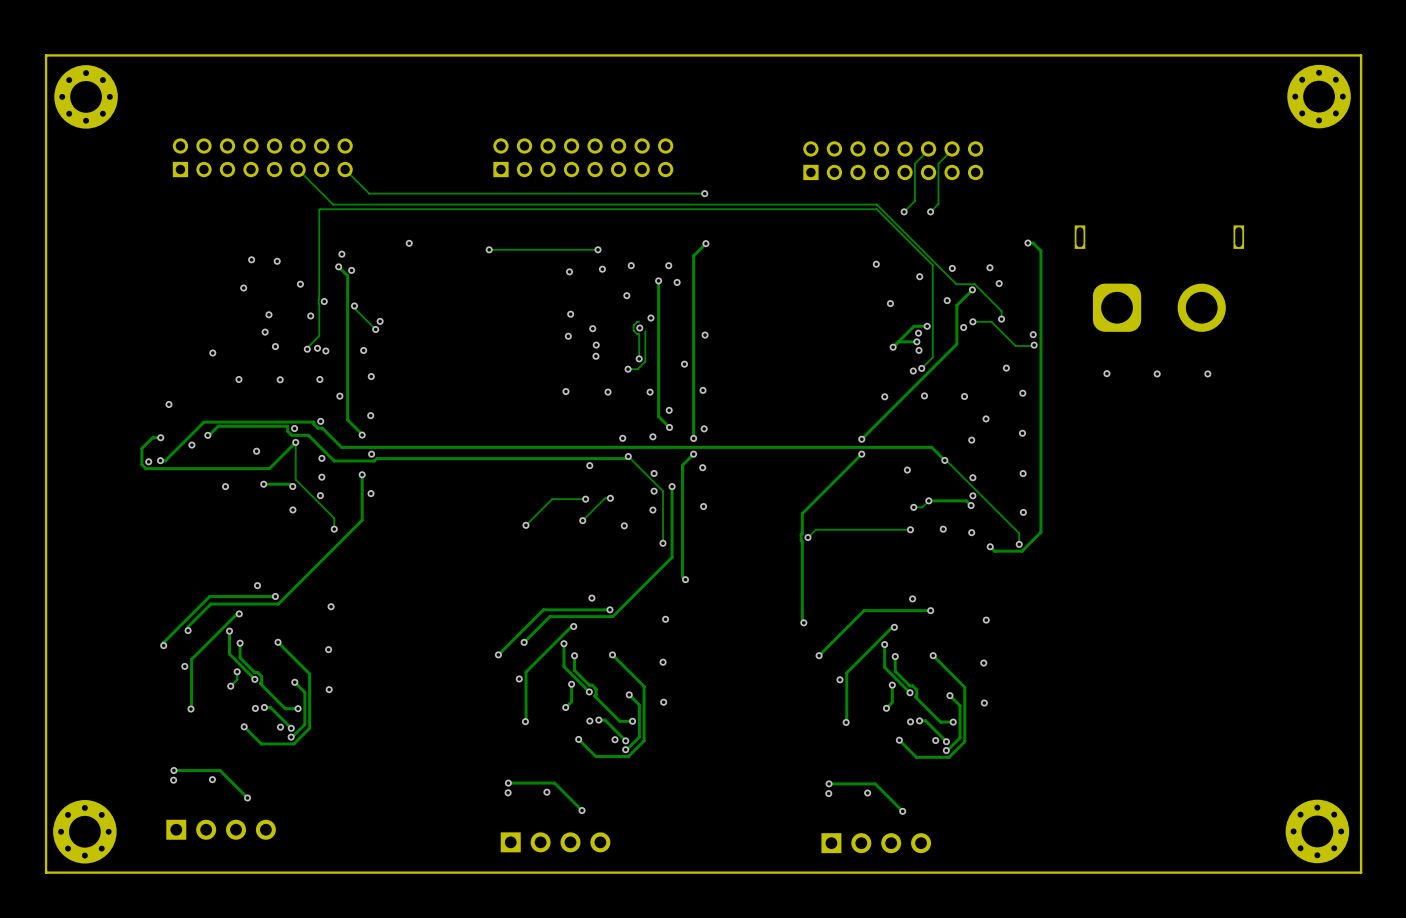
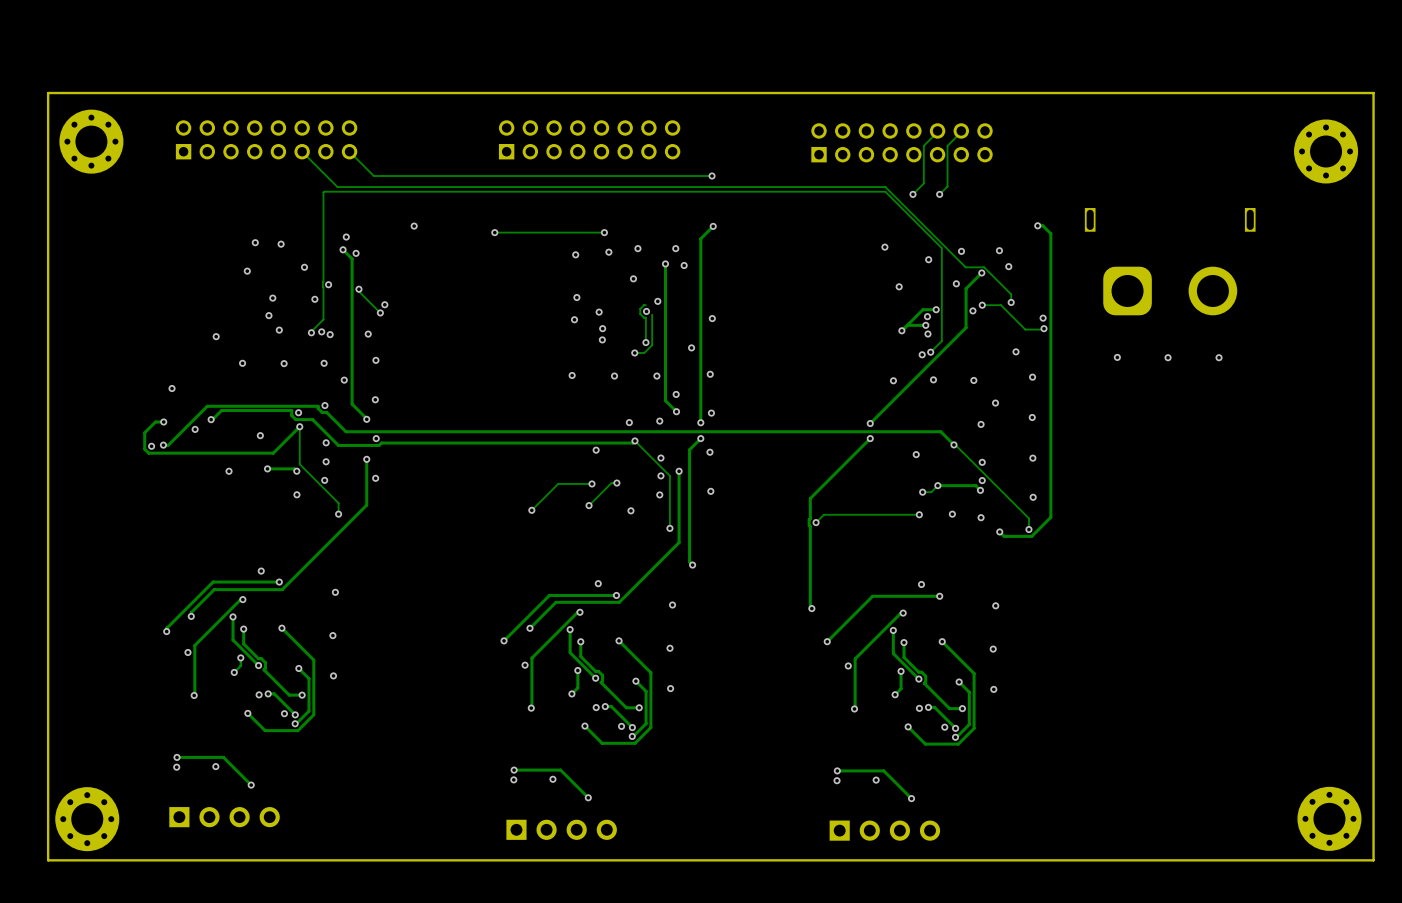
part position: (86, 96) -> (91, 141)
part position: (1319, 96) -> (1326, 151)
board edge: (1361, 111) (1361, 55) (46, 55) (46, 111) -> (1373, 93) (48, 93)

